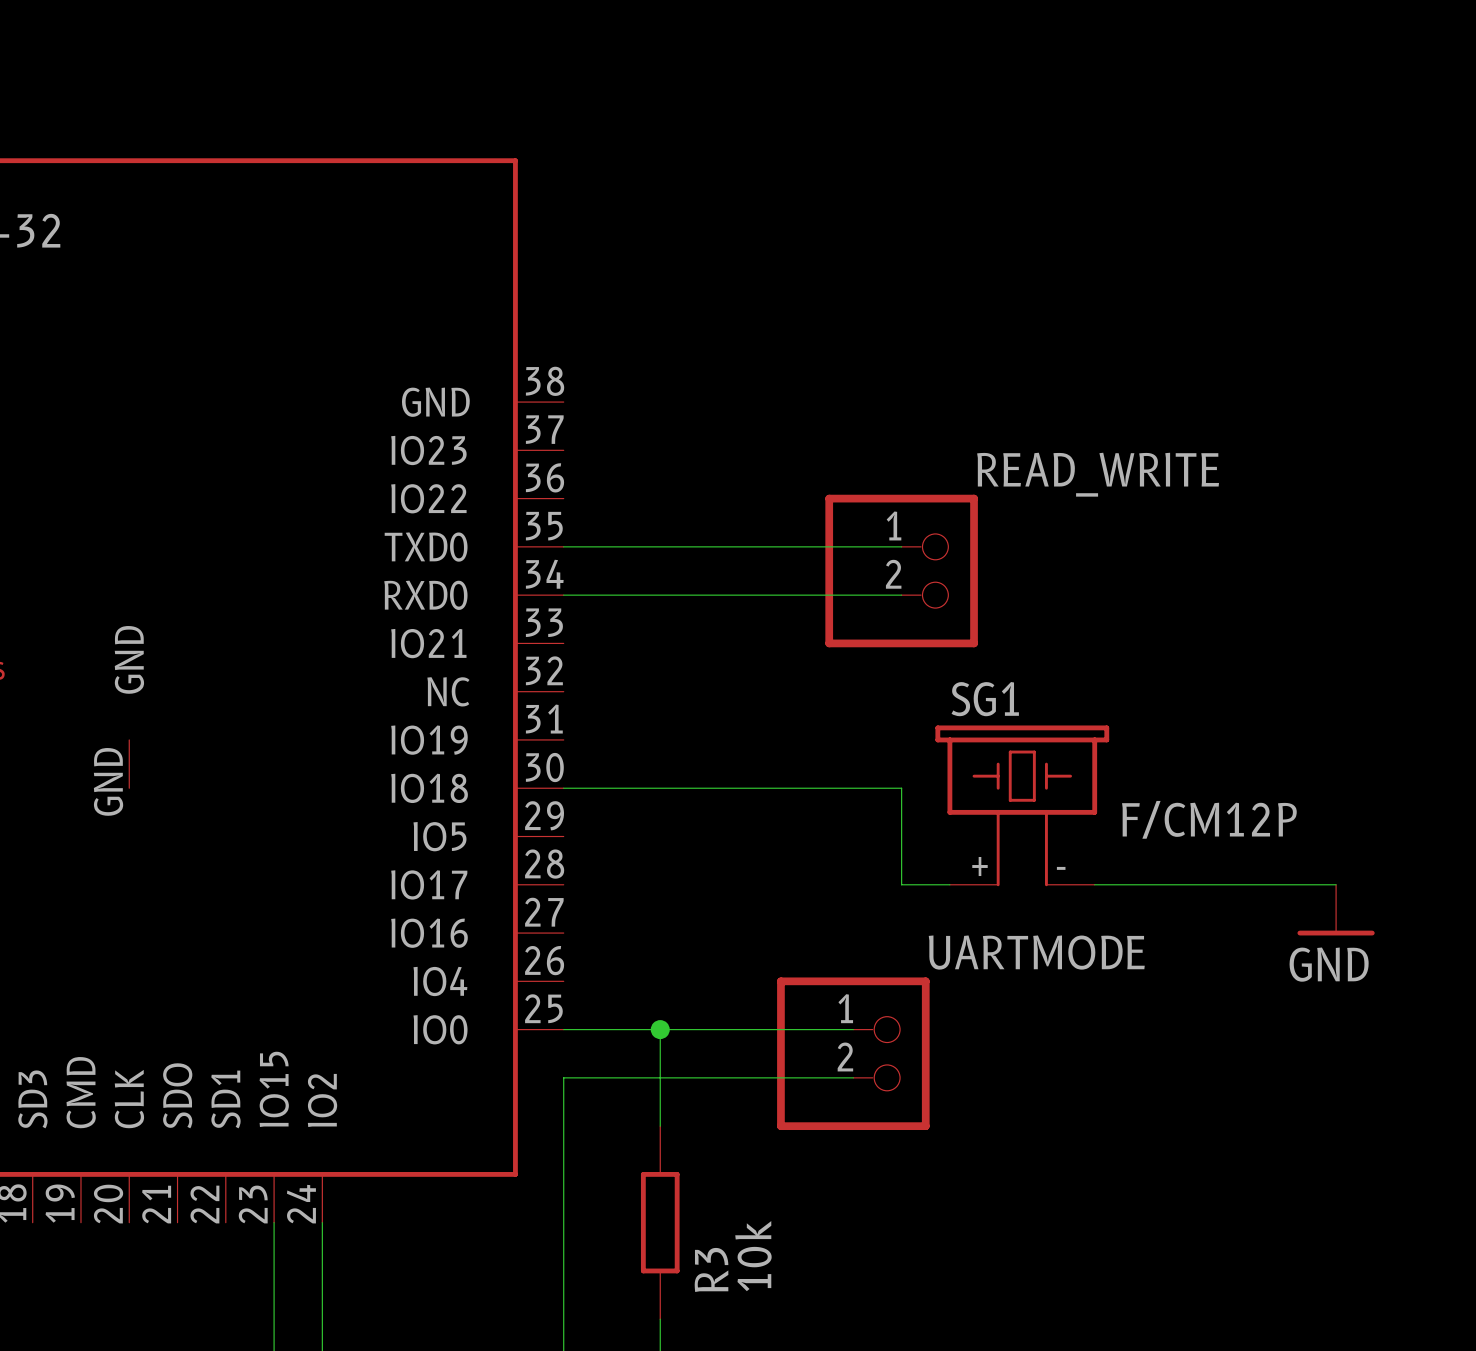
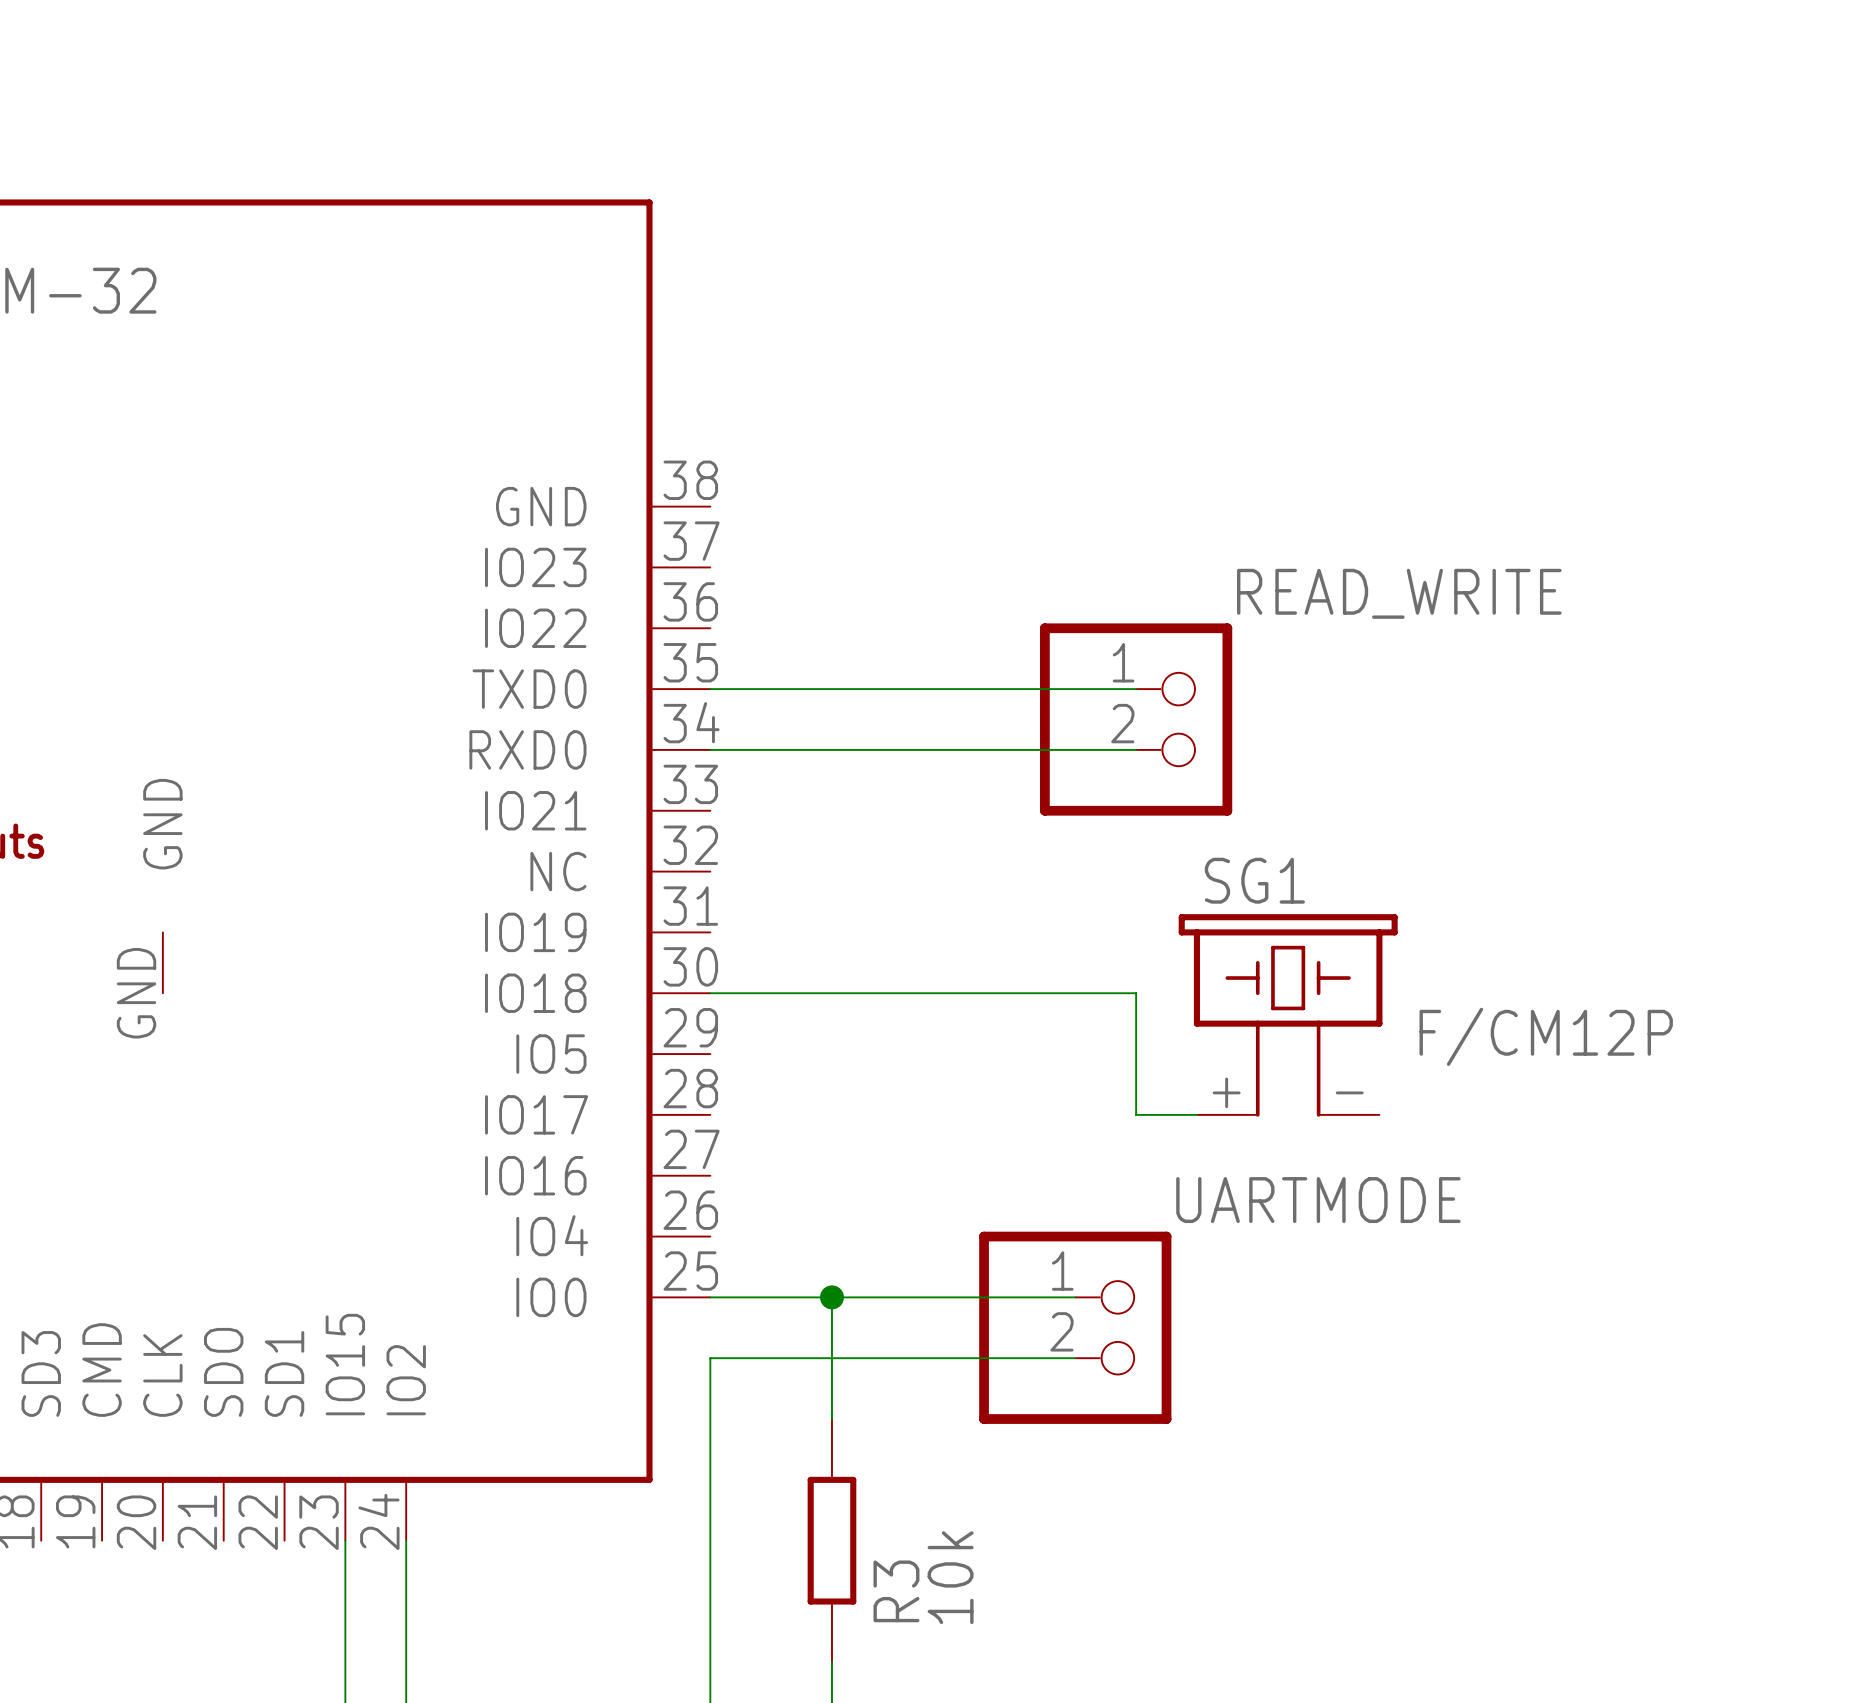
wire: (1094, 884) (1336, 884) -> none
power symbol: GND (1336, 910) -> none

